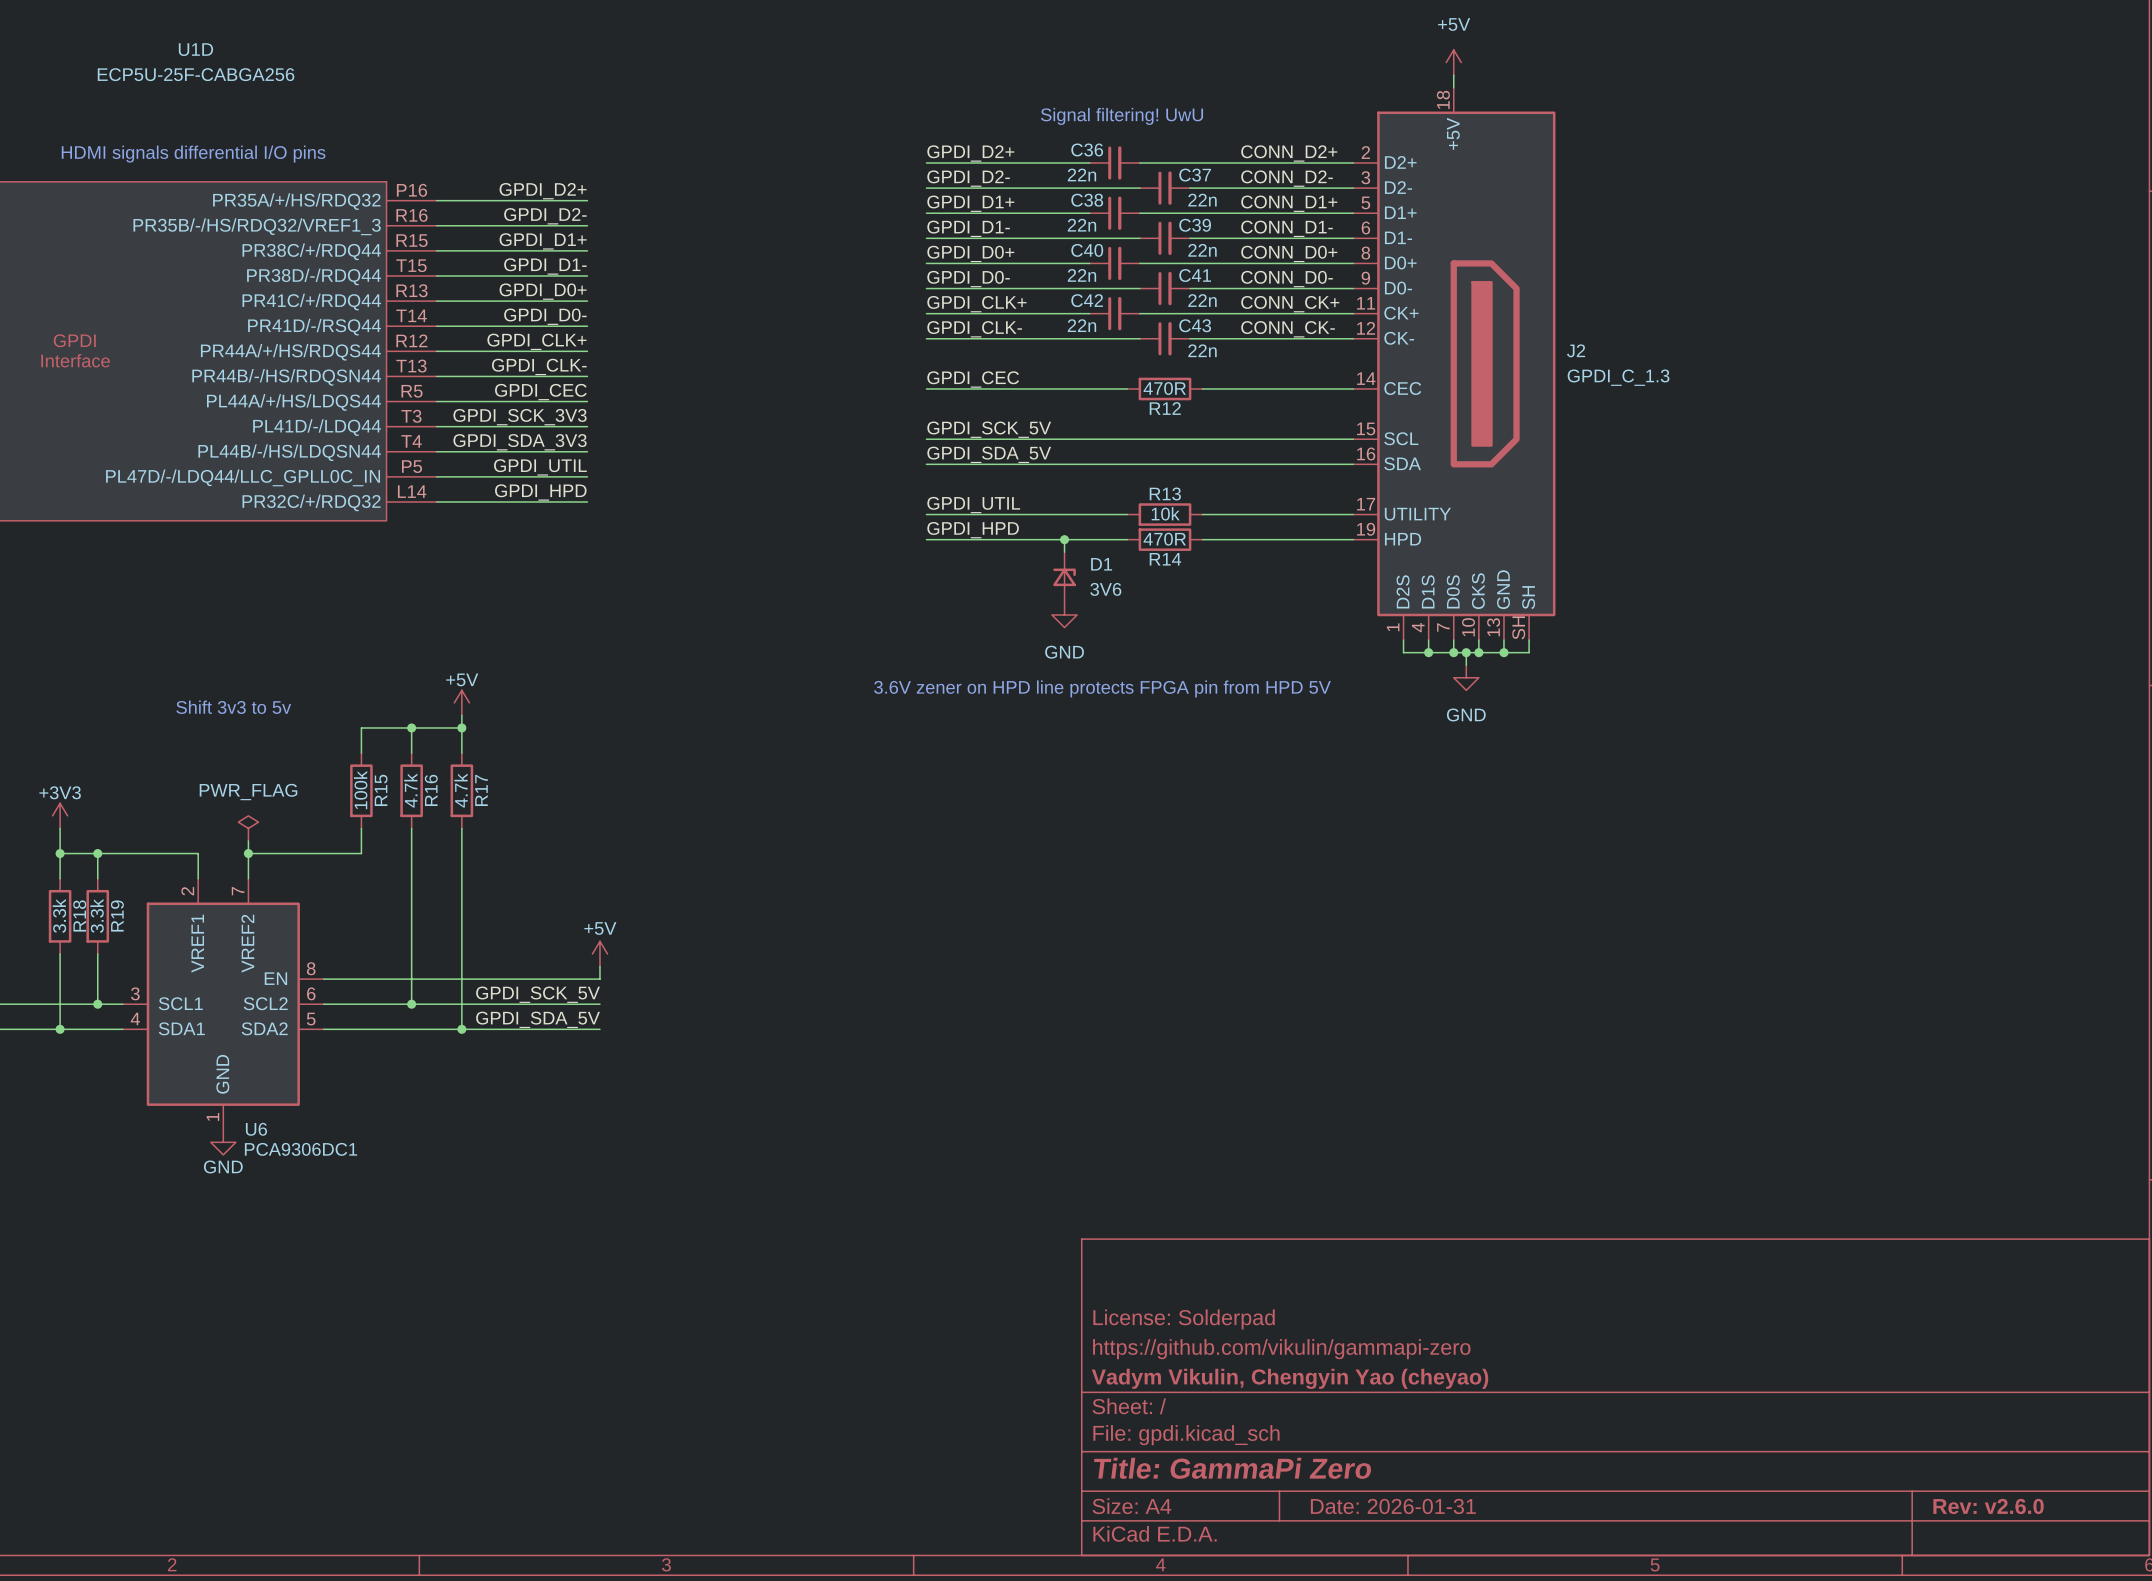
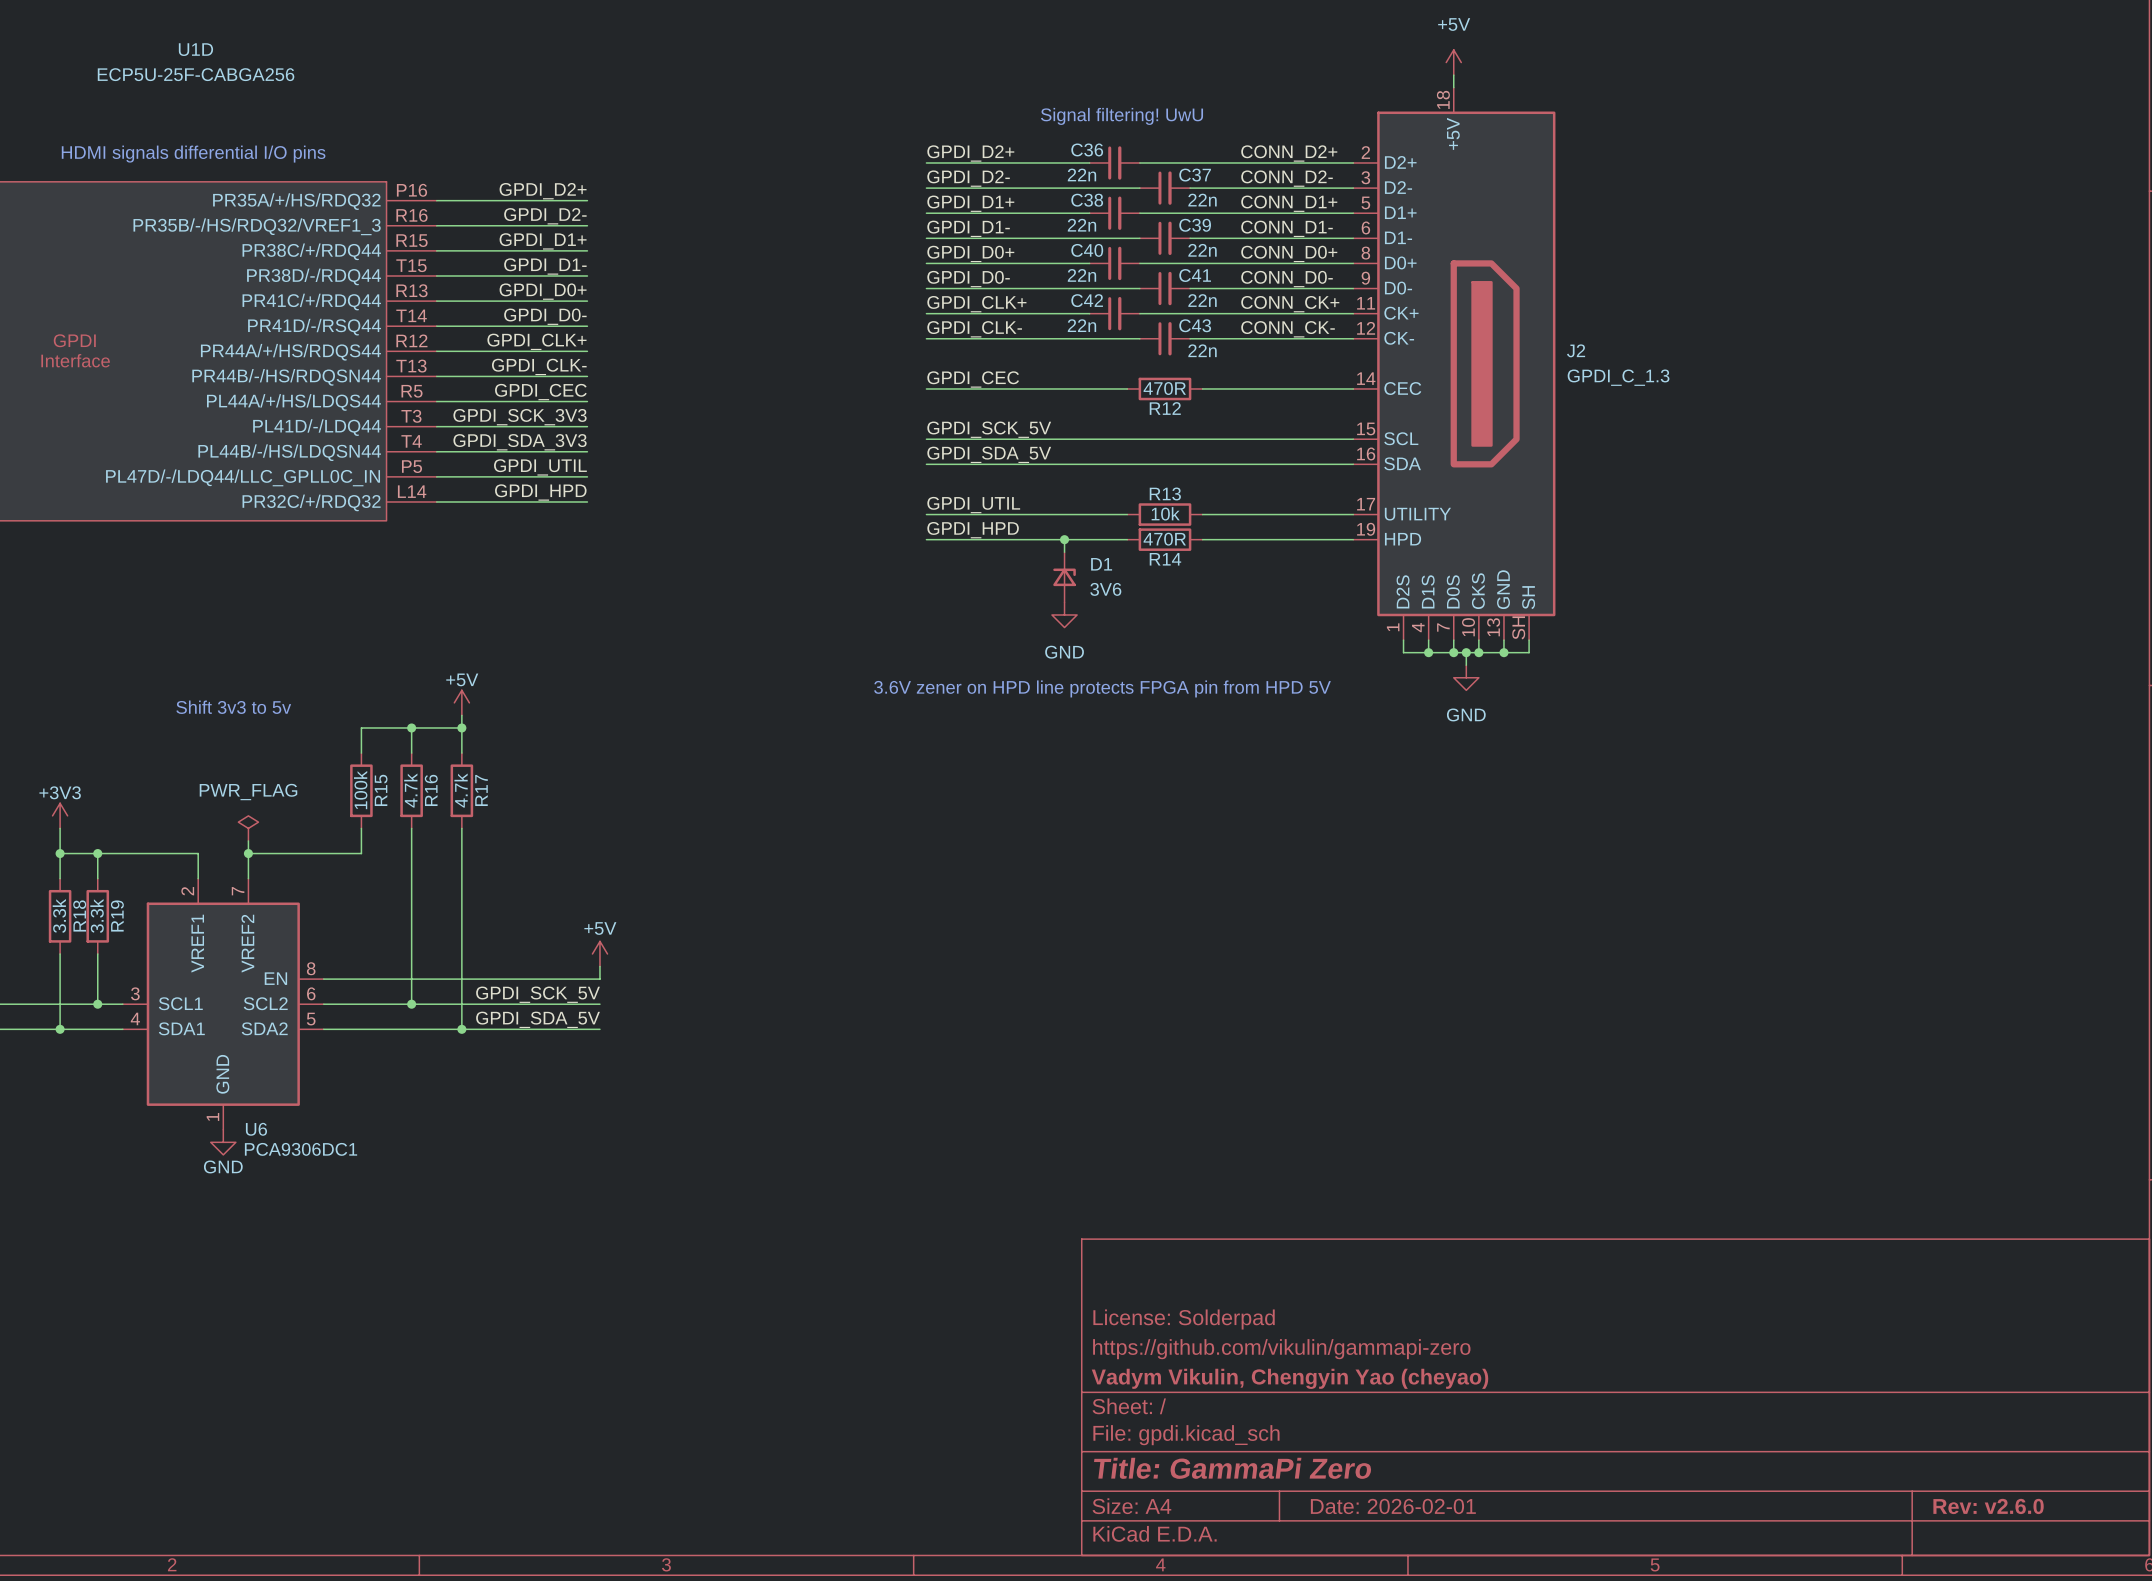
title block: Date: 2026-01-31 (1393, 1506) -> Date: 2026-02-01 (1393, 1506)

